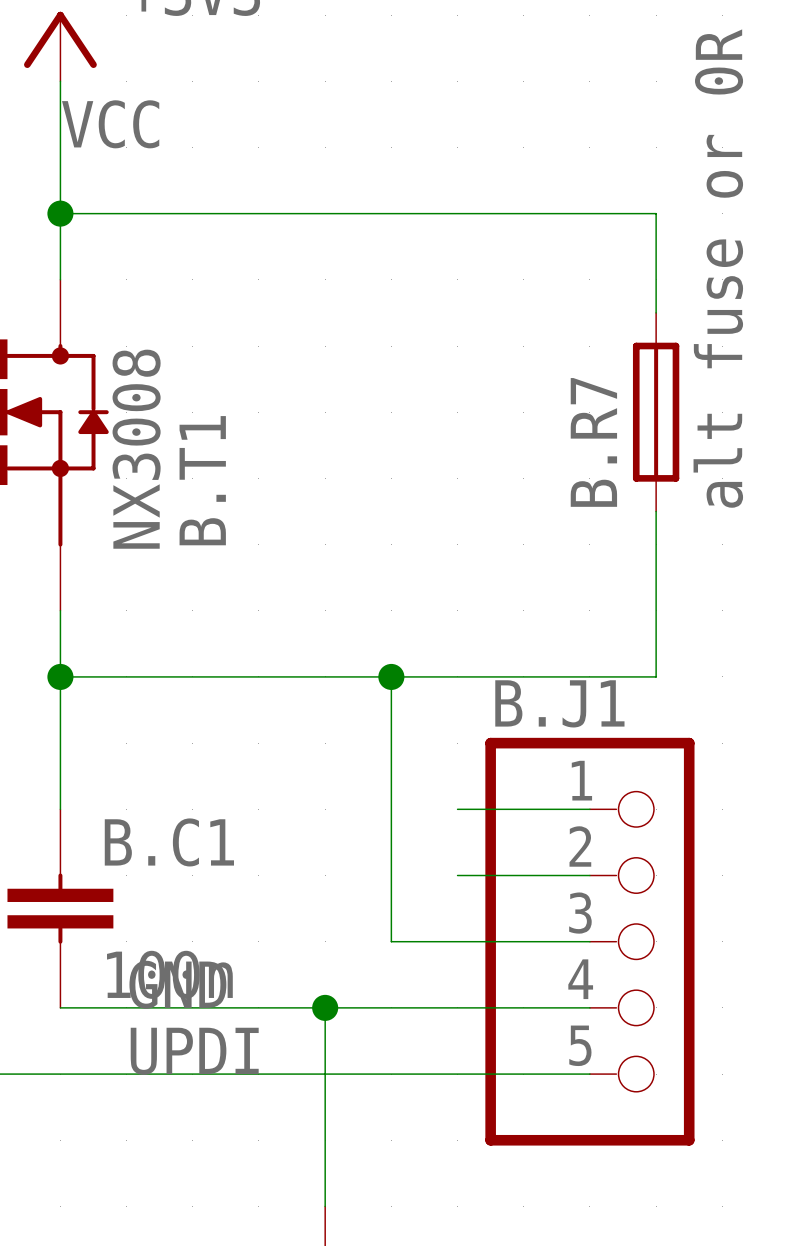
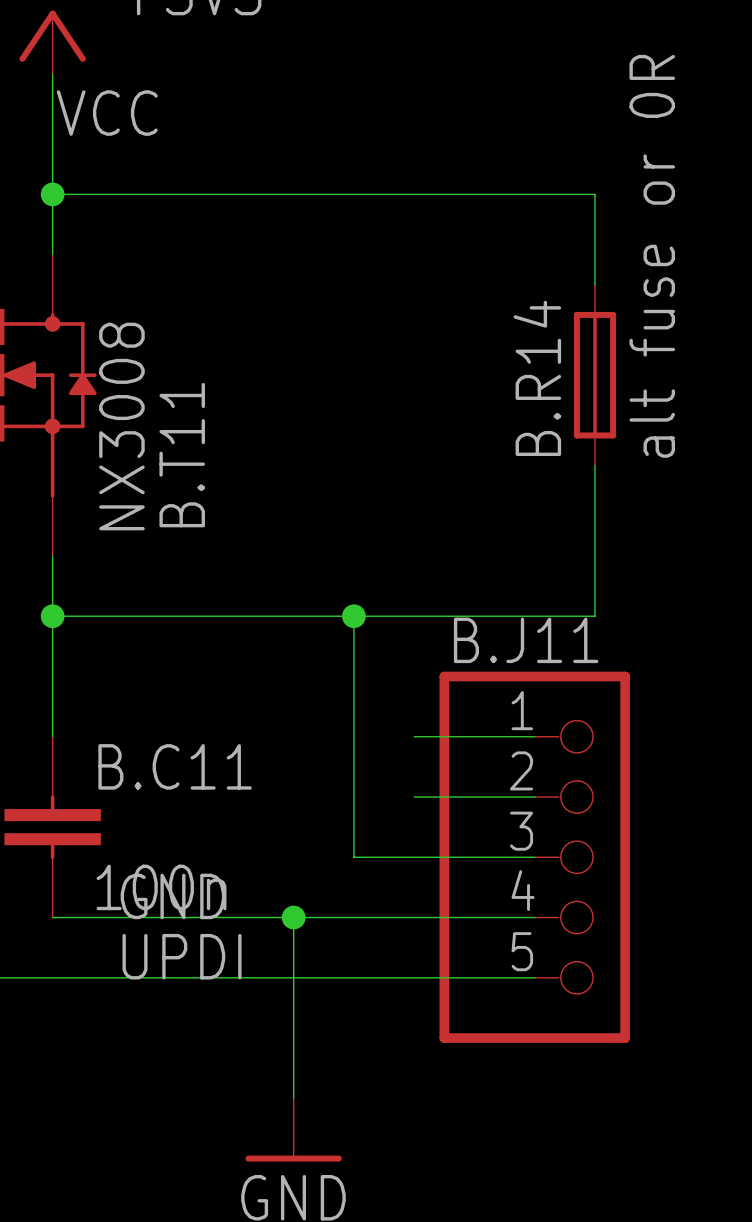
B.R7 name: B.R7 (593, 442) -> B.R14 (537, 378)
B.T1 name: B.T1 (202, 480) -> B.T11 (182, 455)
B.J1 name: B.J1 (559, 703) -> B.J11 (526, 640)
B.C1 name: B.C1 (169, 842) -> B.C11 (175, 766)

